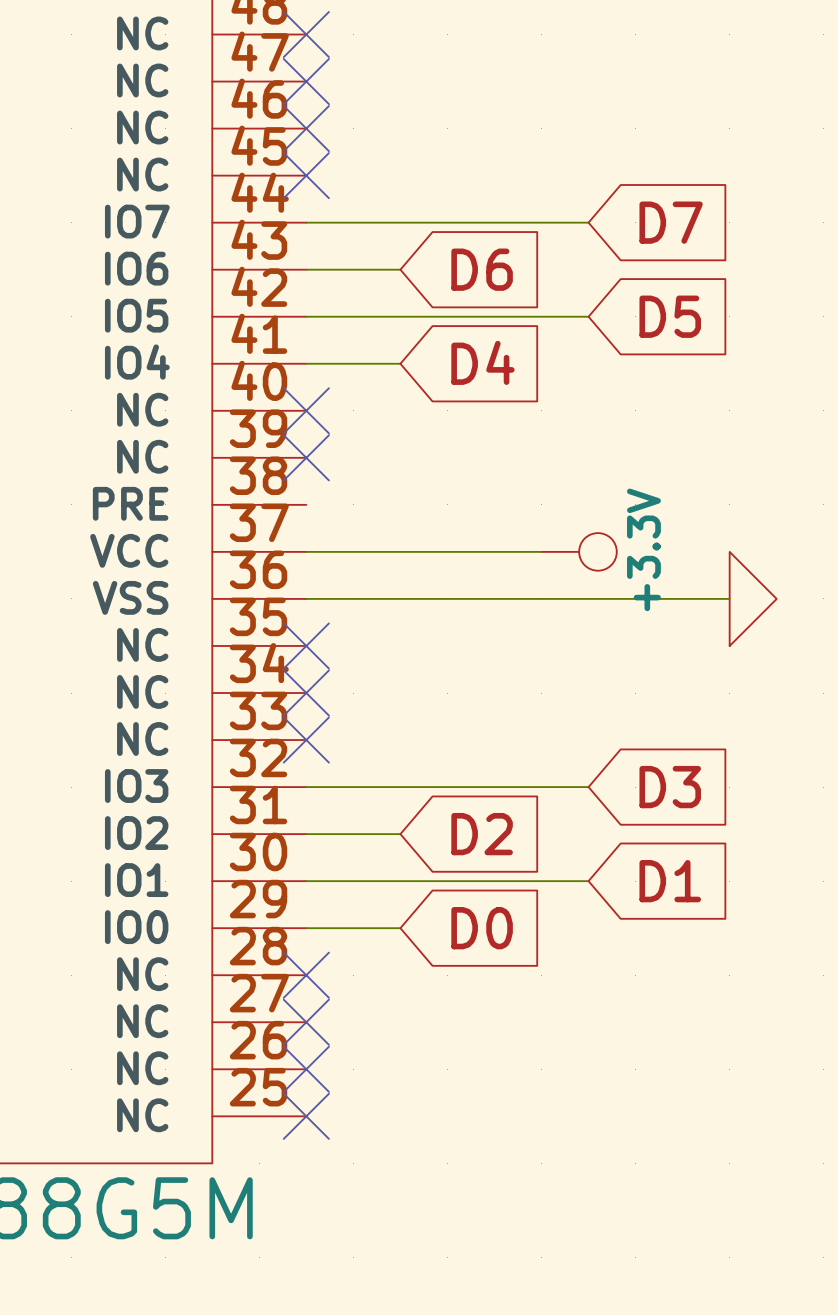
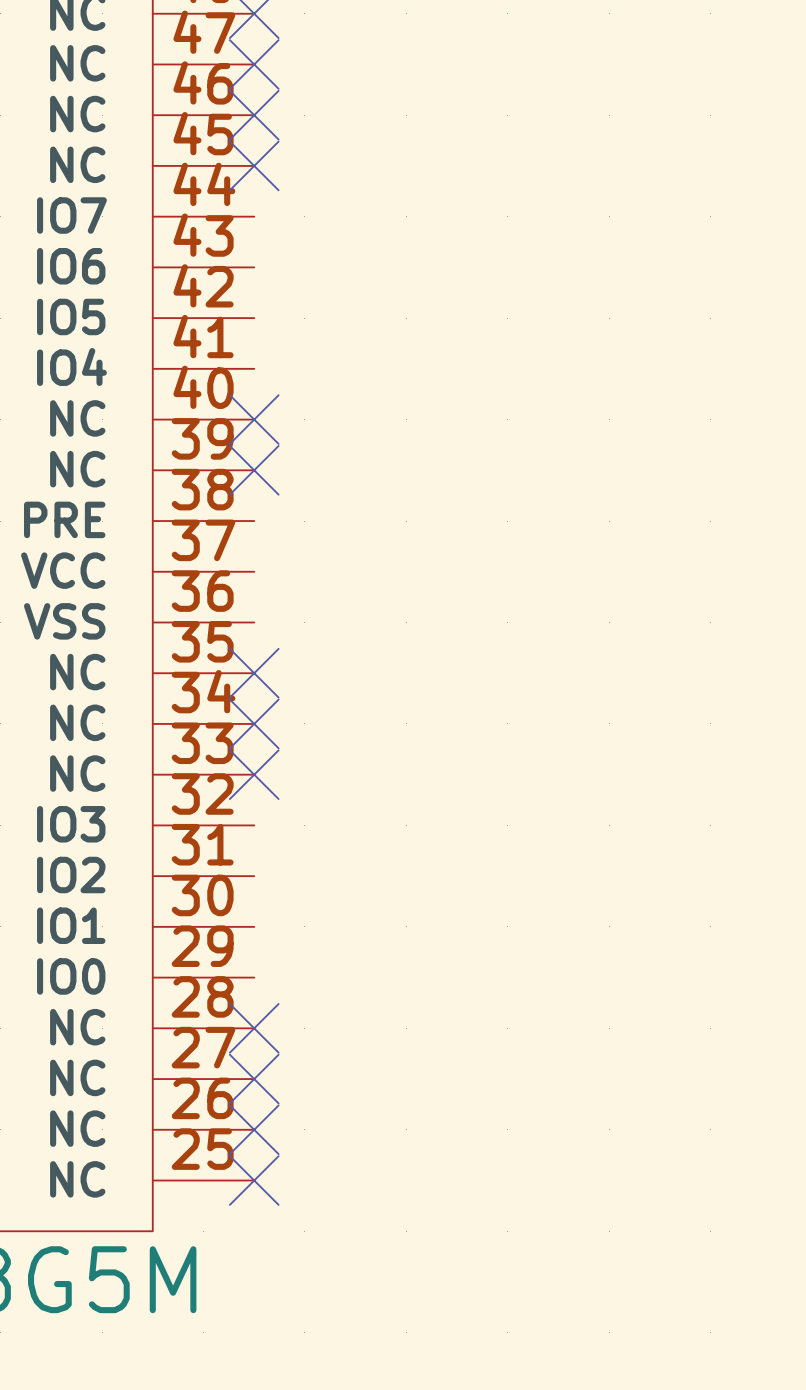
wire: (306, 222) (588, 222) -> none
global label: D7 (671, 222) -> none
wire: (306, 269) (400, 269) -> none
global label: D6 (482, 269) -> none
wire: (306, 316) (588, 316) -> none
global label: D5 (670, 316) -> none
global label: D4 (482, 362) -> none
wire: (306, 363) (400, 363) -> none
wire: (306, 551) (541, 551) -> none
power symbol: +3.3V (579, 551) -> none
wire: (306, 598) (729, 598) -> none
power symbol: (753, 598) -> none
wire: (306, 787) (588, 787) -> none
global label: D3 (670, 787) -> none
wire: (306, 834) (400, 834) -> none
global label: D2 (482, 834) -> none
wire: (306, 881) (588, 881) -> none
global label: D1 (670, 881) -> none
wire: (306, 928) (400, 928) -> none
global label: D0 (482, 928) -> none

